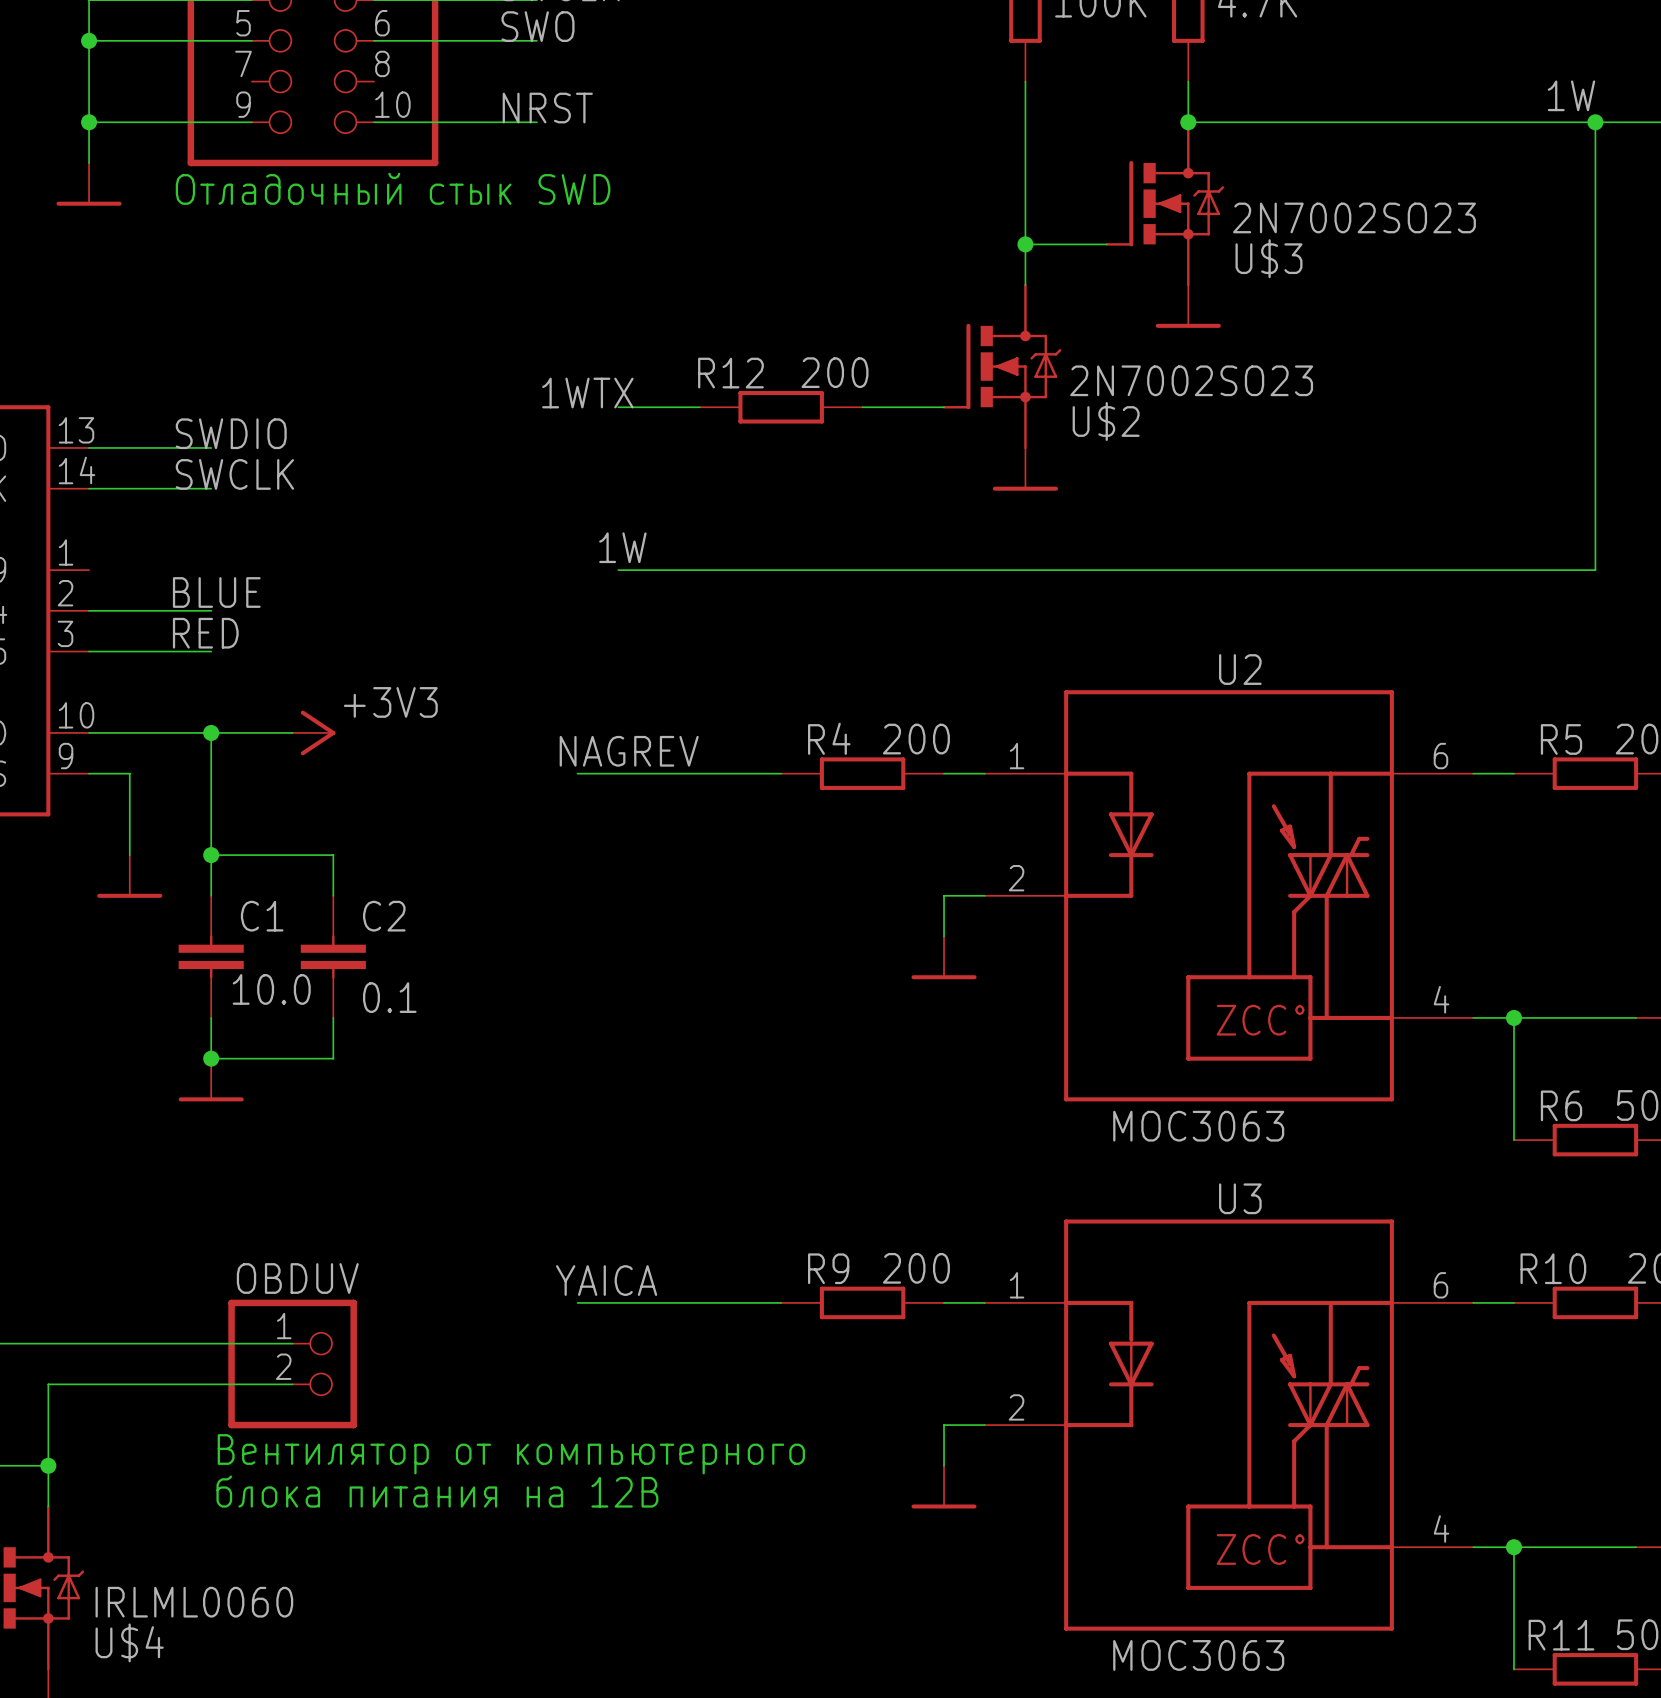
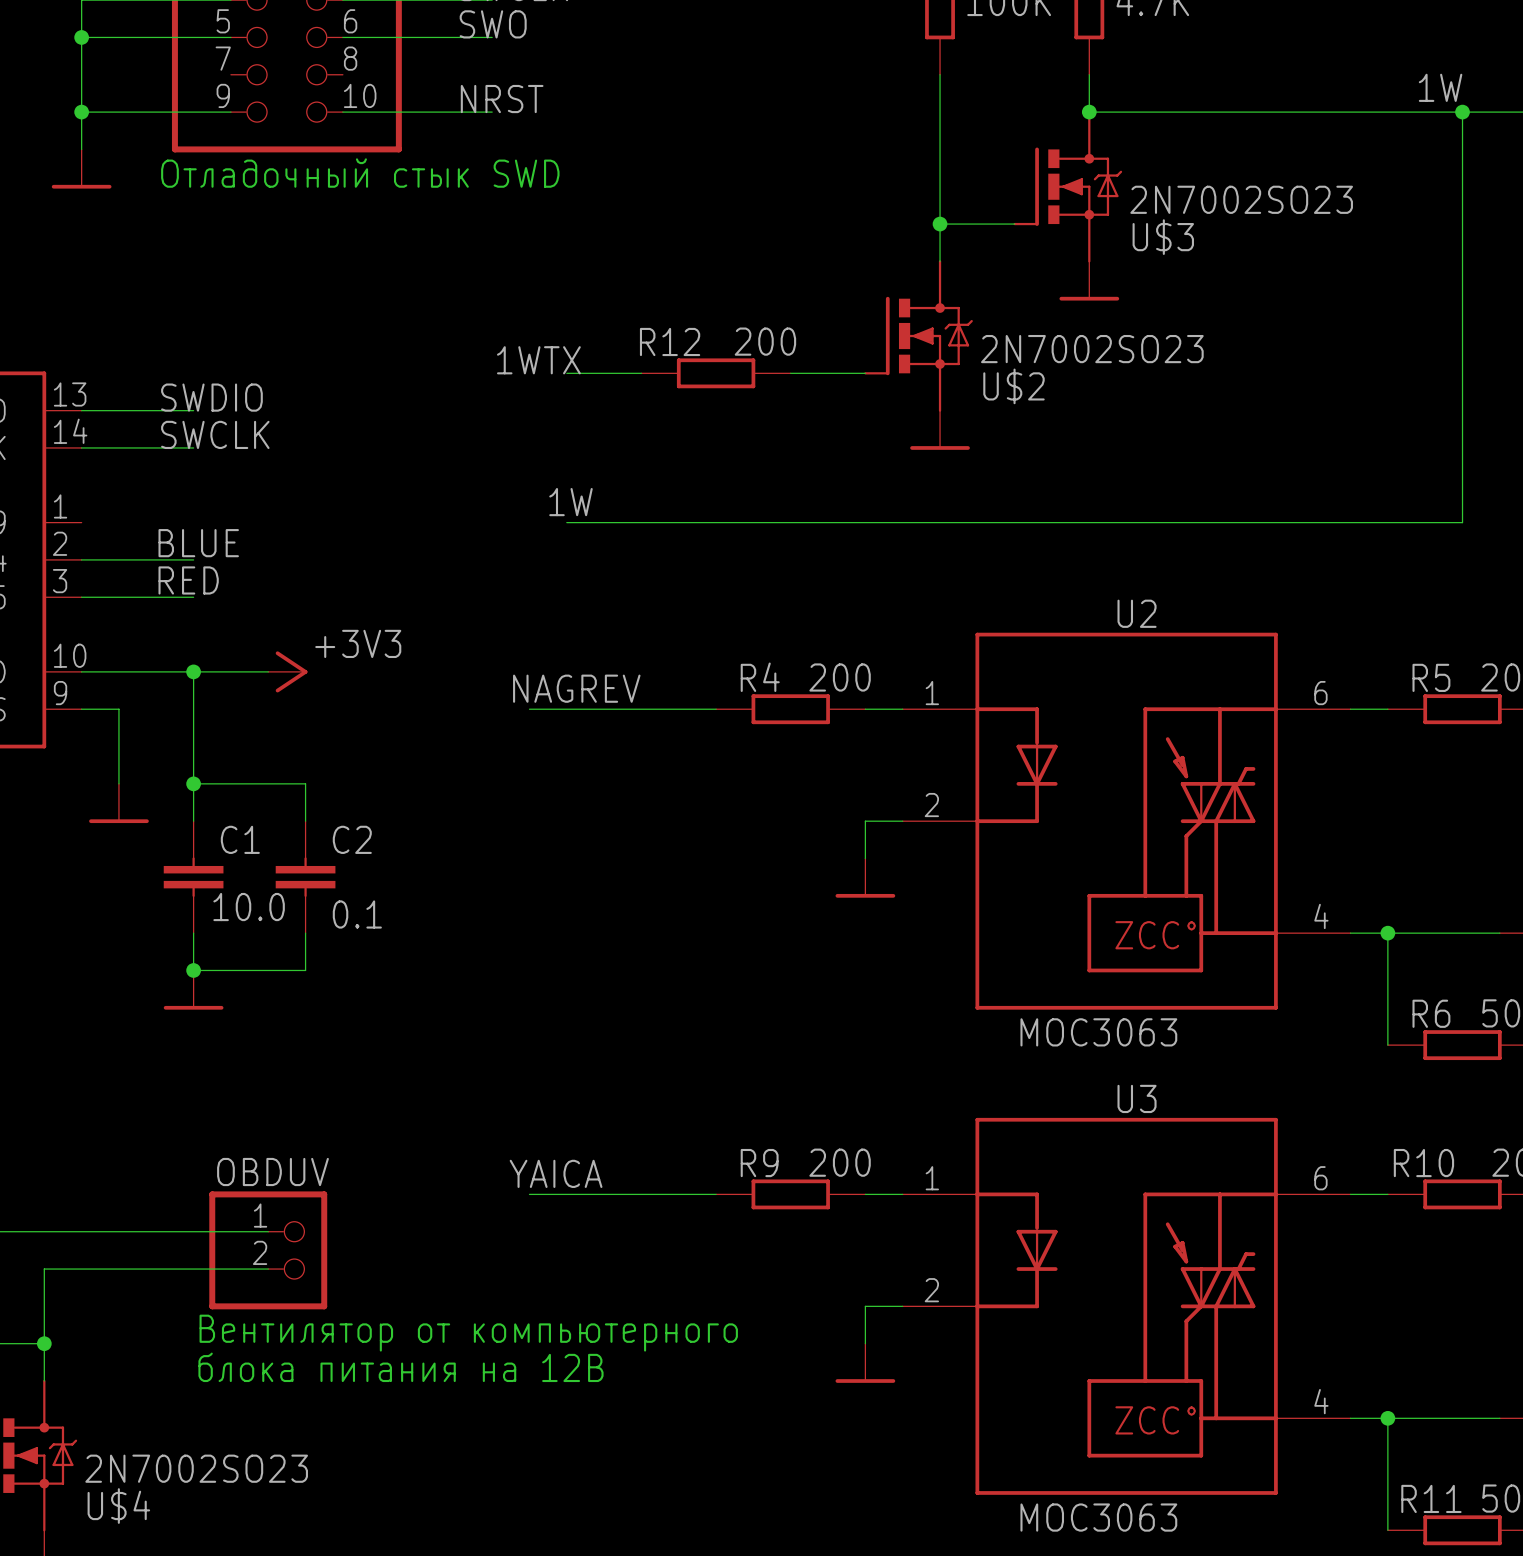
U$4 value: IRLML0060 (194, 1602) -> 2N7002SO23 (196, 1468)

